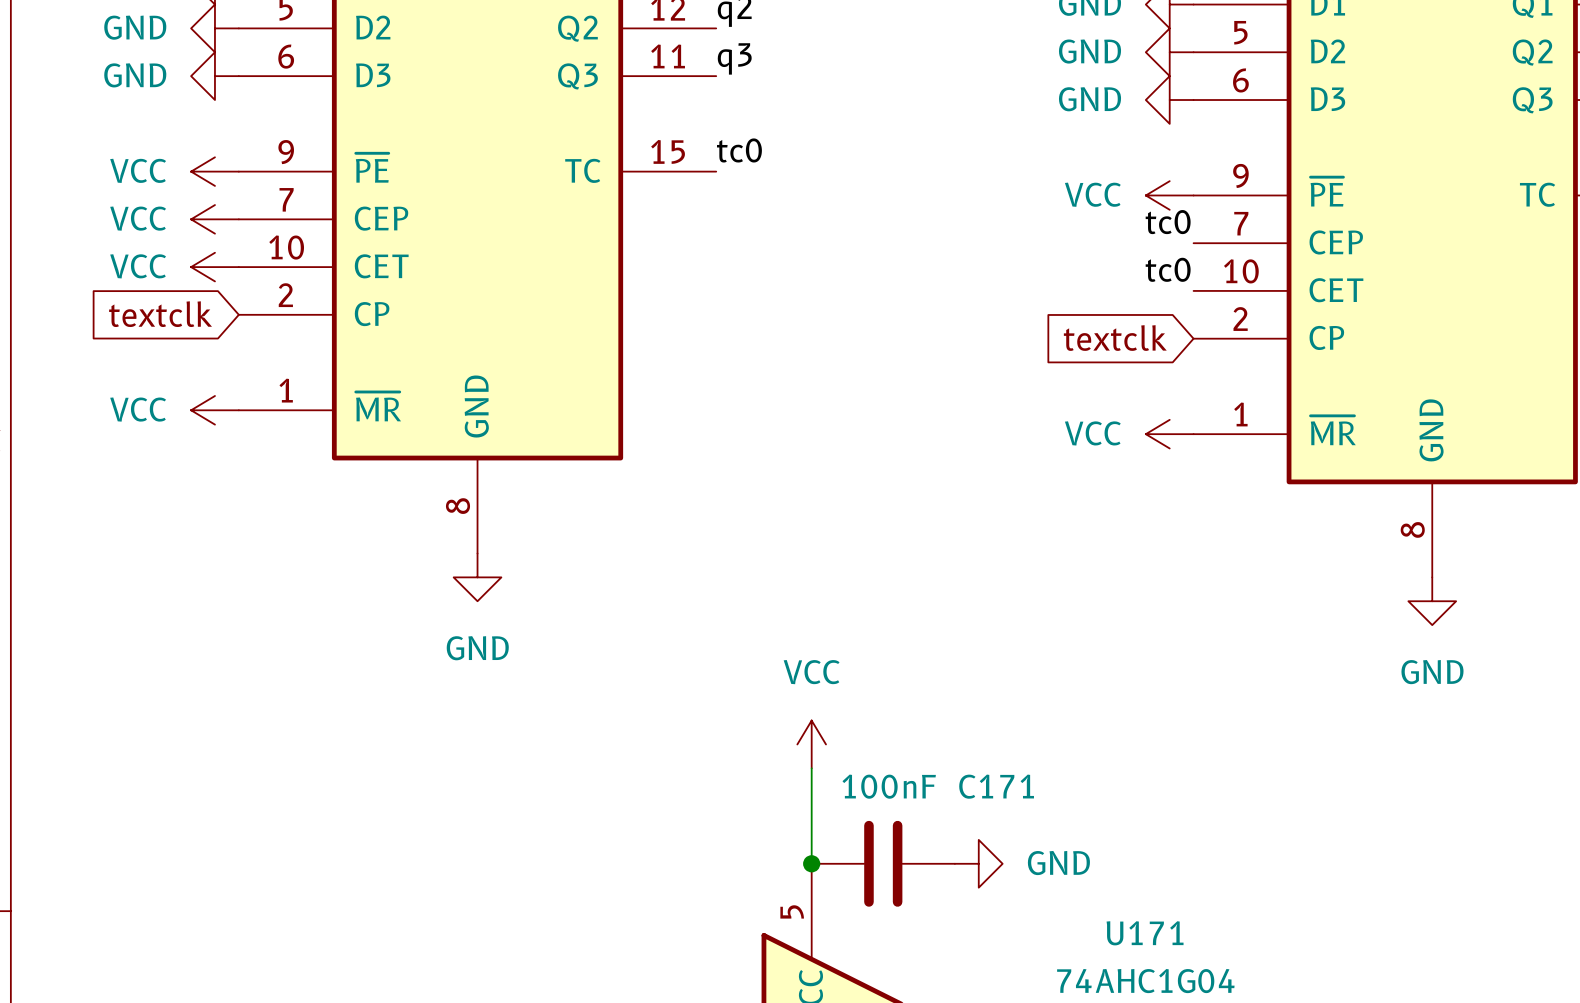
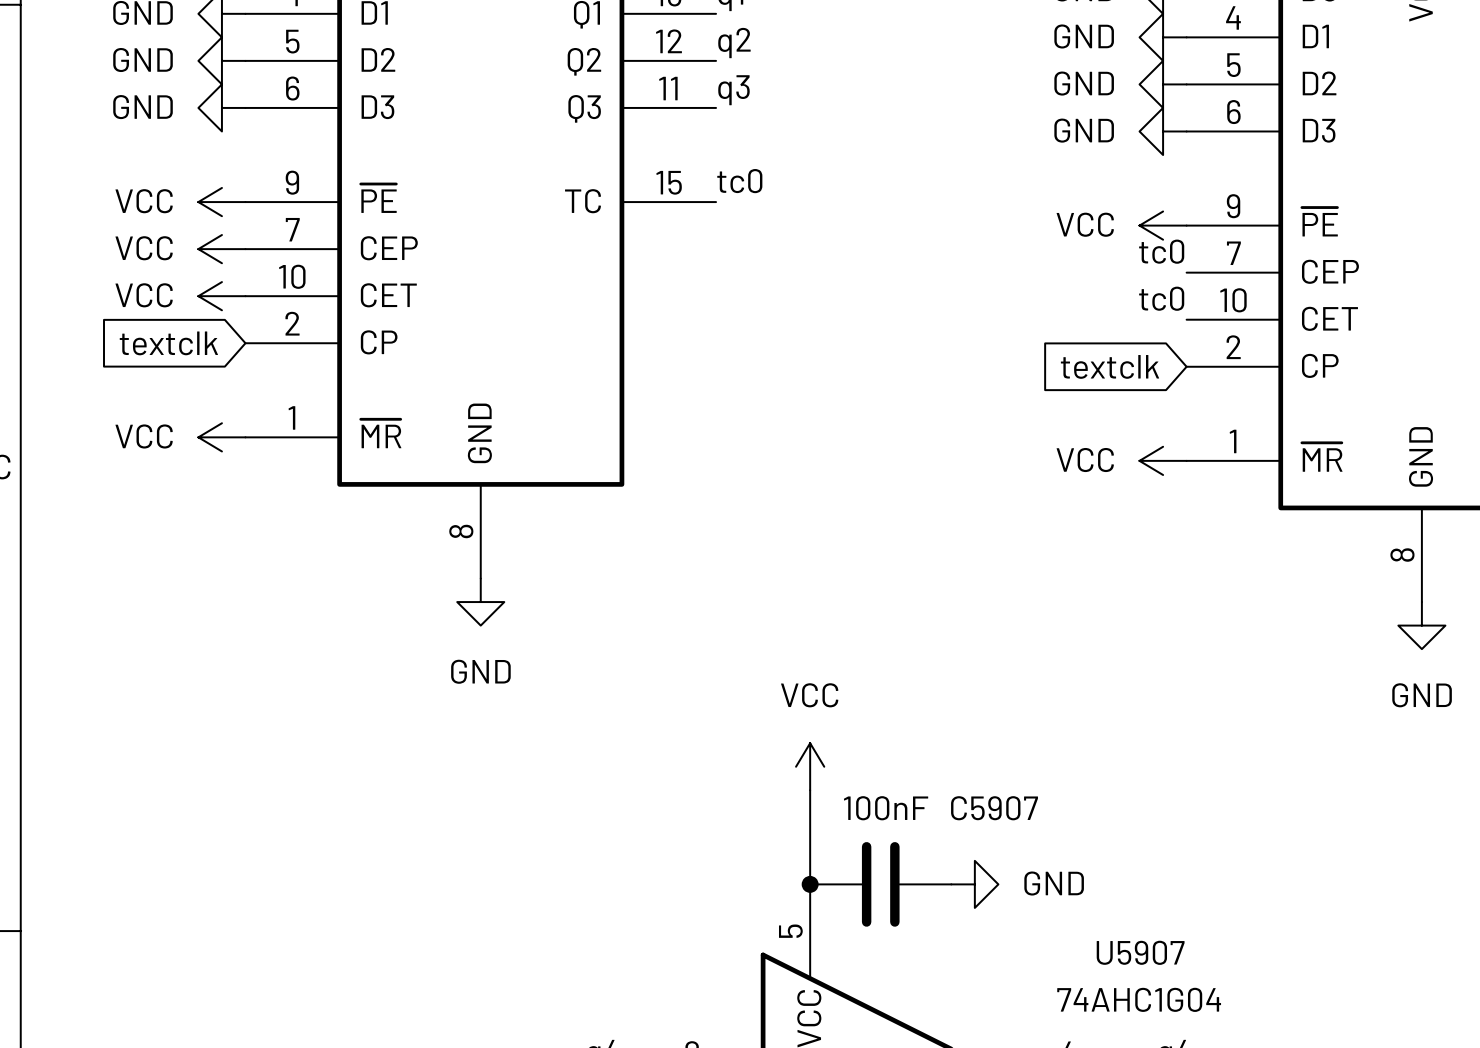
C171 name: C171 (996, 786) -> C5907 (994, 808)
U171 name: U171 (1145, 933) -> U5907 (1140, 952)

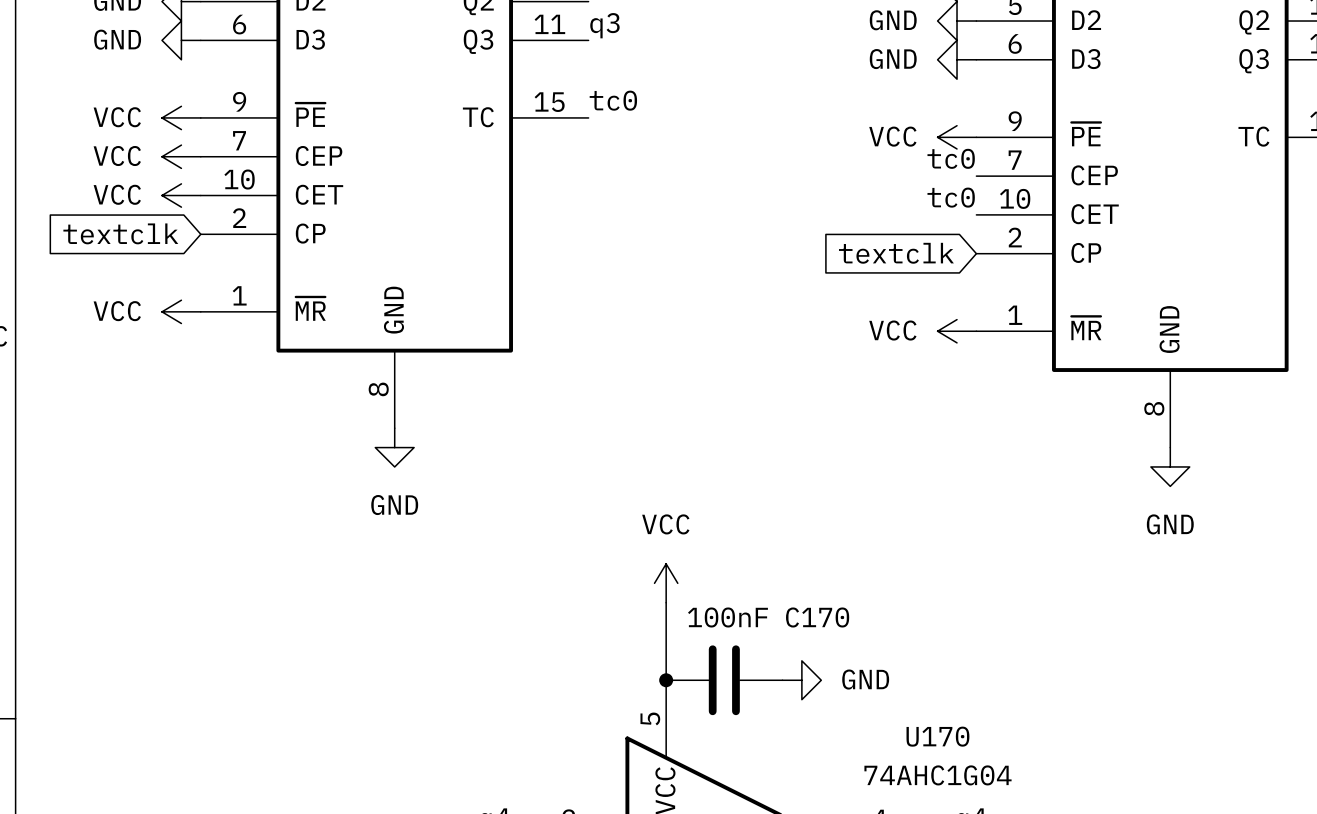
C5907 name: C5907 (994, 808) -> C170 (817, 617)
U5907 name: U5907 (1140, 952) -> U170 (937, 736)

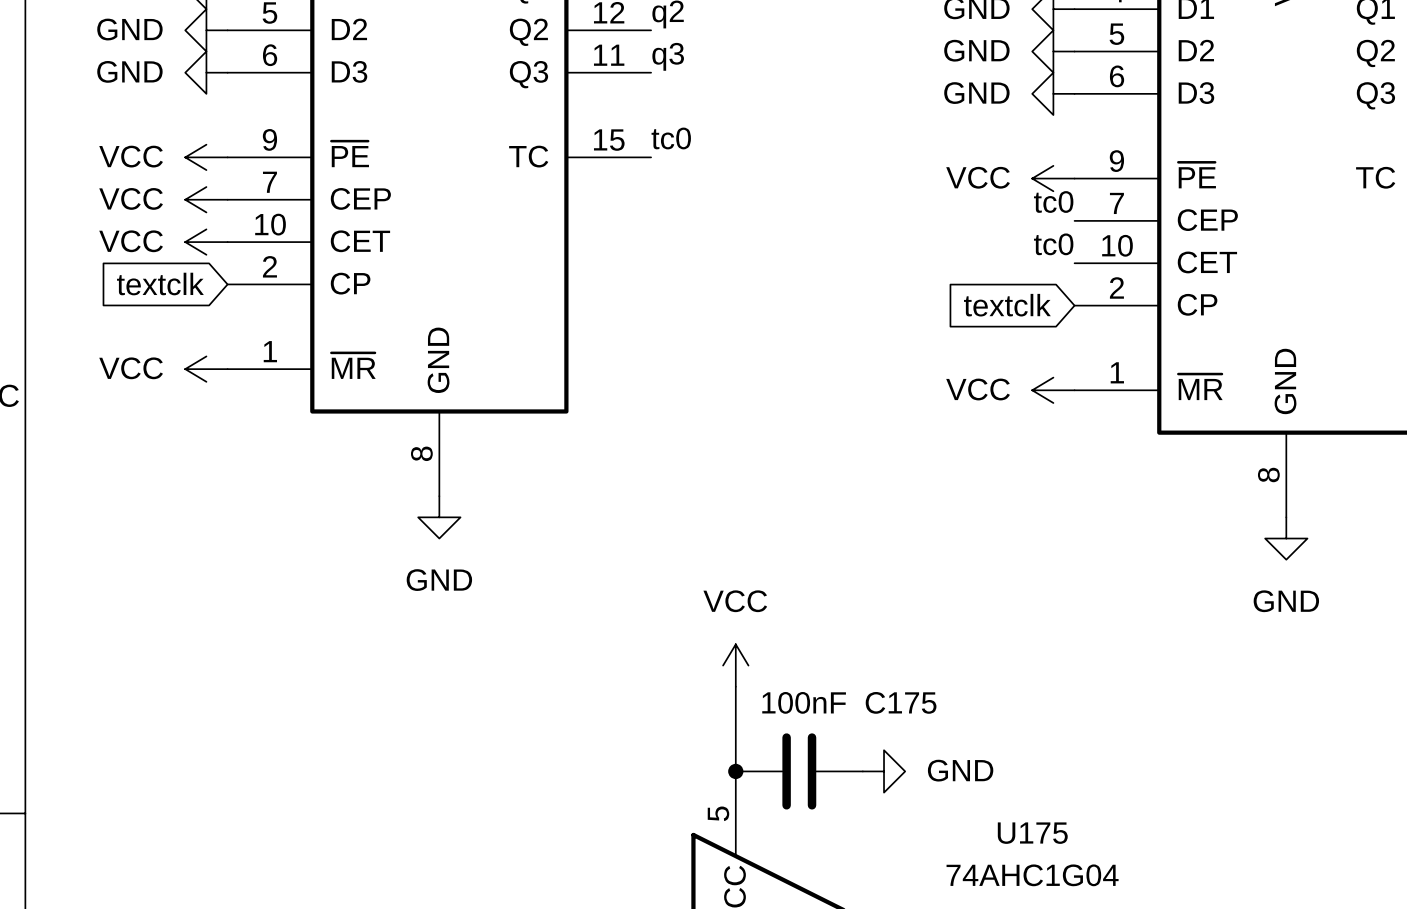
C170 name: C170 (817, 617) -> C175 (901, 702)
U170 name: U170 (937, 736) -> U175 (1032, 833)

